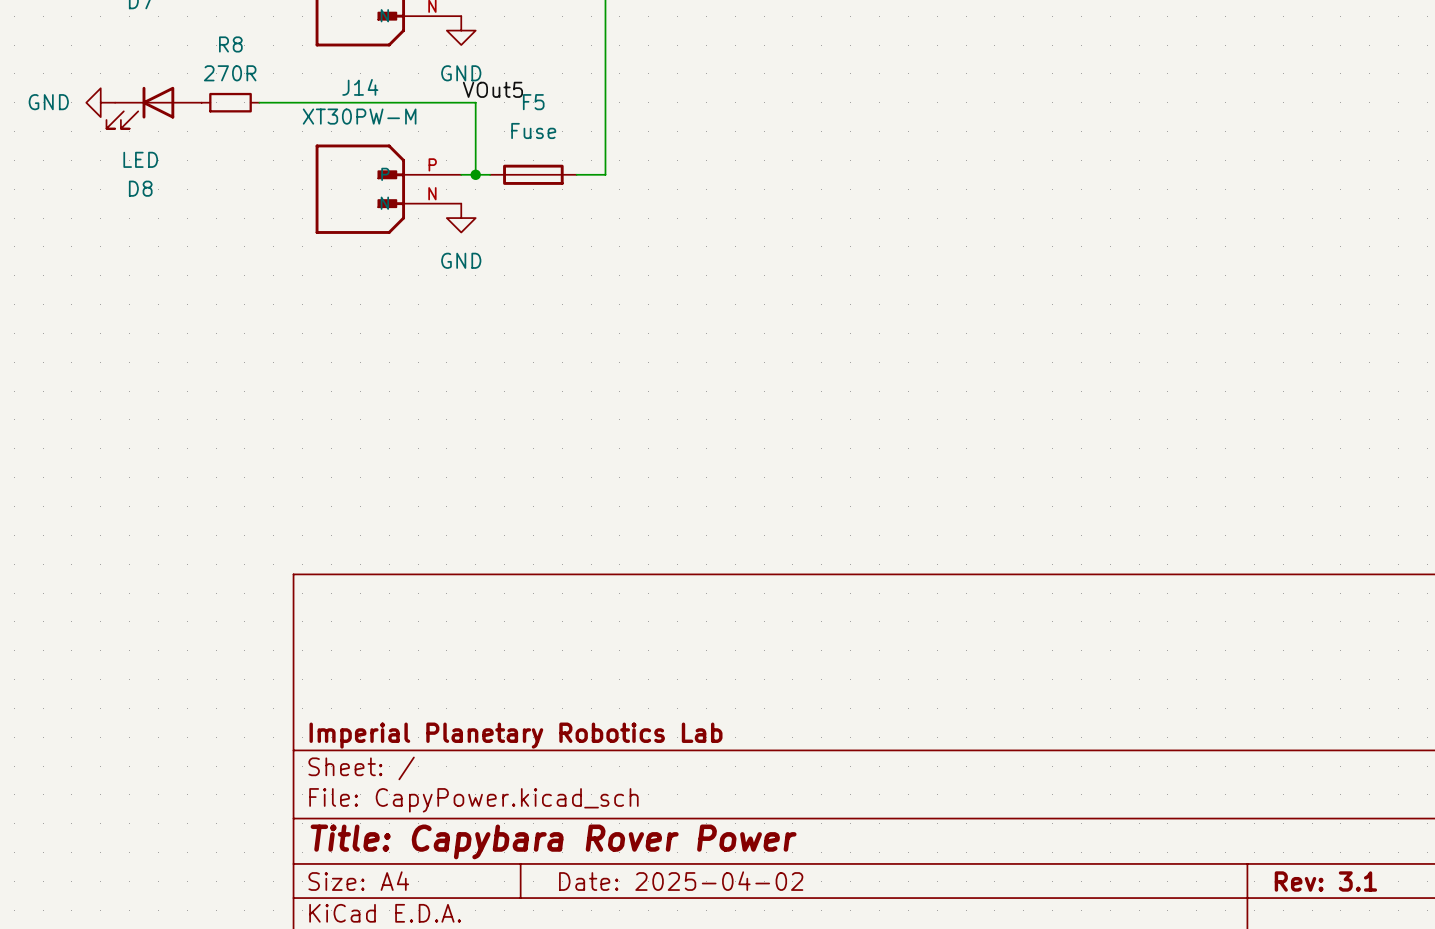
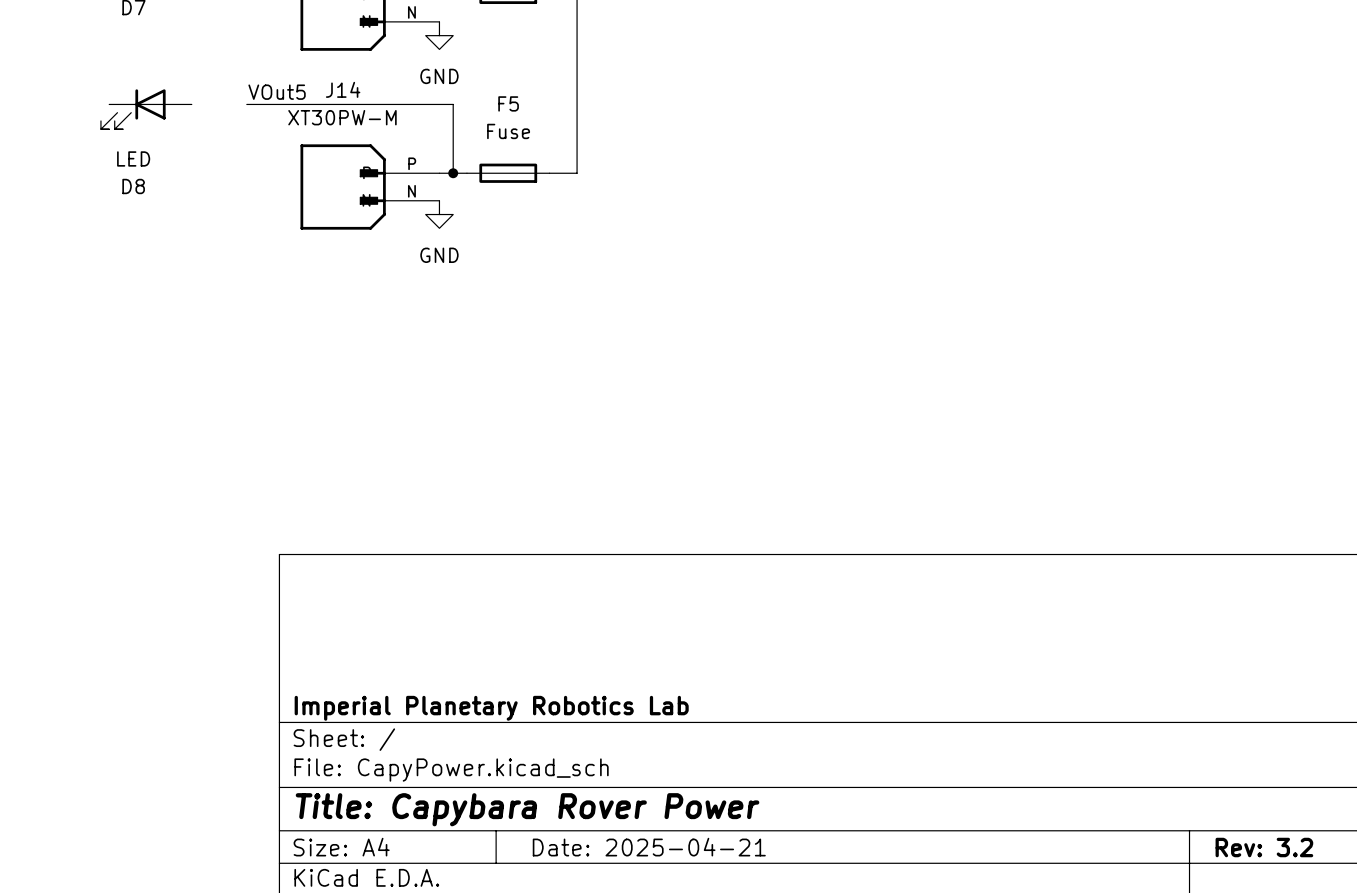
label position: VOut5 (492, 89) -> VOut5 (277, 92)
power symbol: GND (100, 102) -> none
R8: 270R (230, 102) -> none
title block: Date: 2025-04-02 (681, 881) -> Date: 2025-04-21 (649, 847)
title block: Rev: 3.1 (1325, 881) -> Rev: 3.2 (1264, 847)

